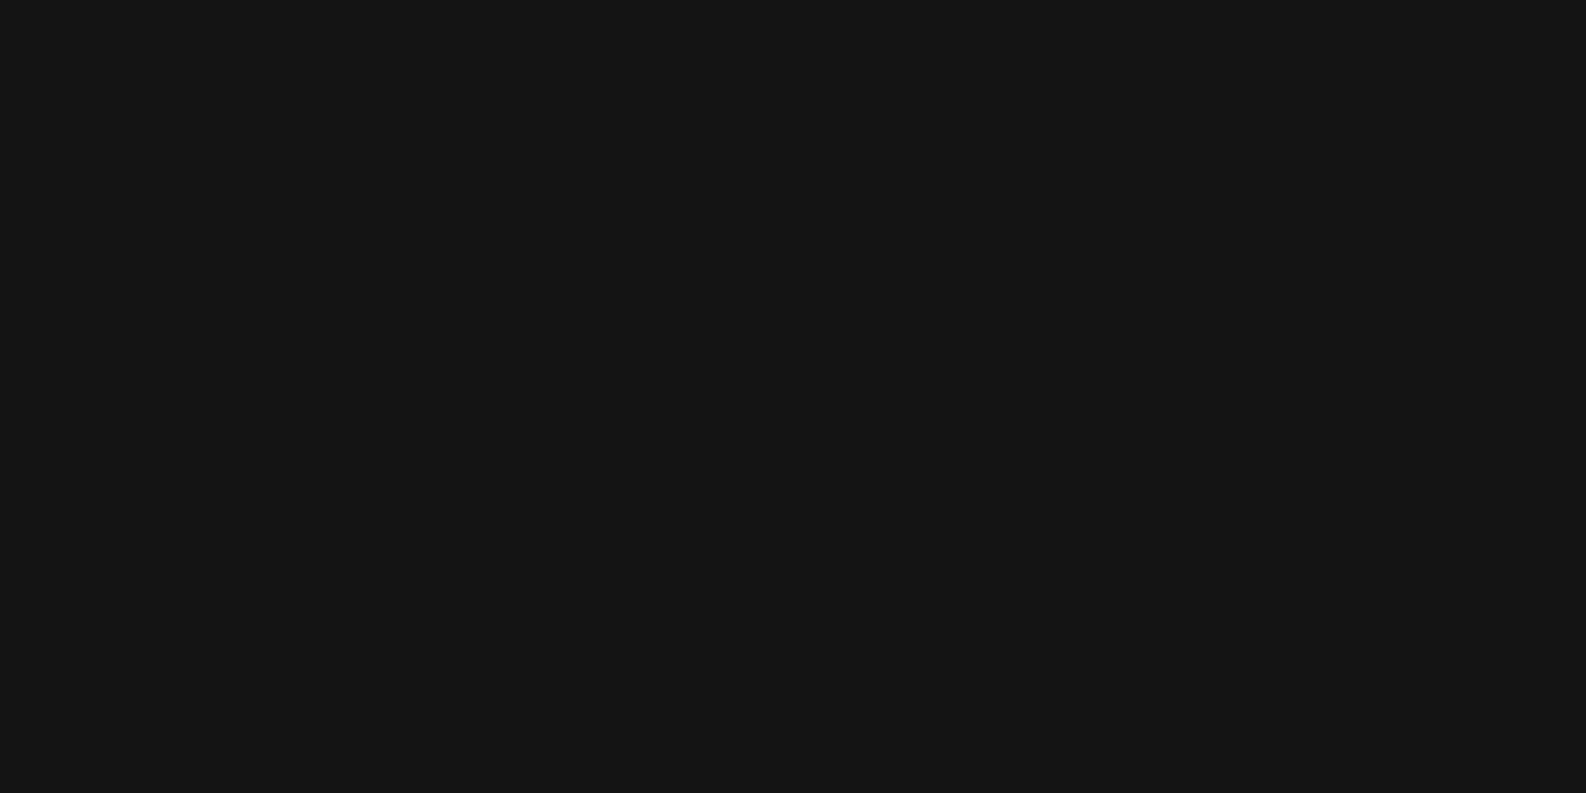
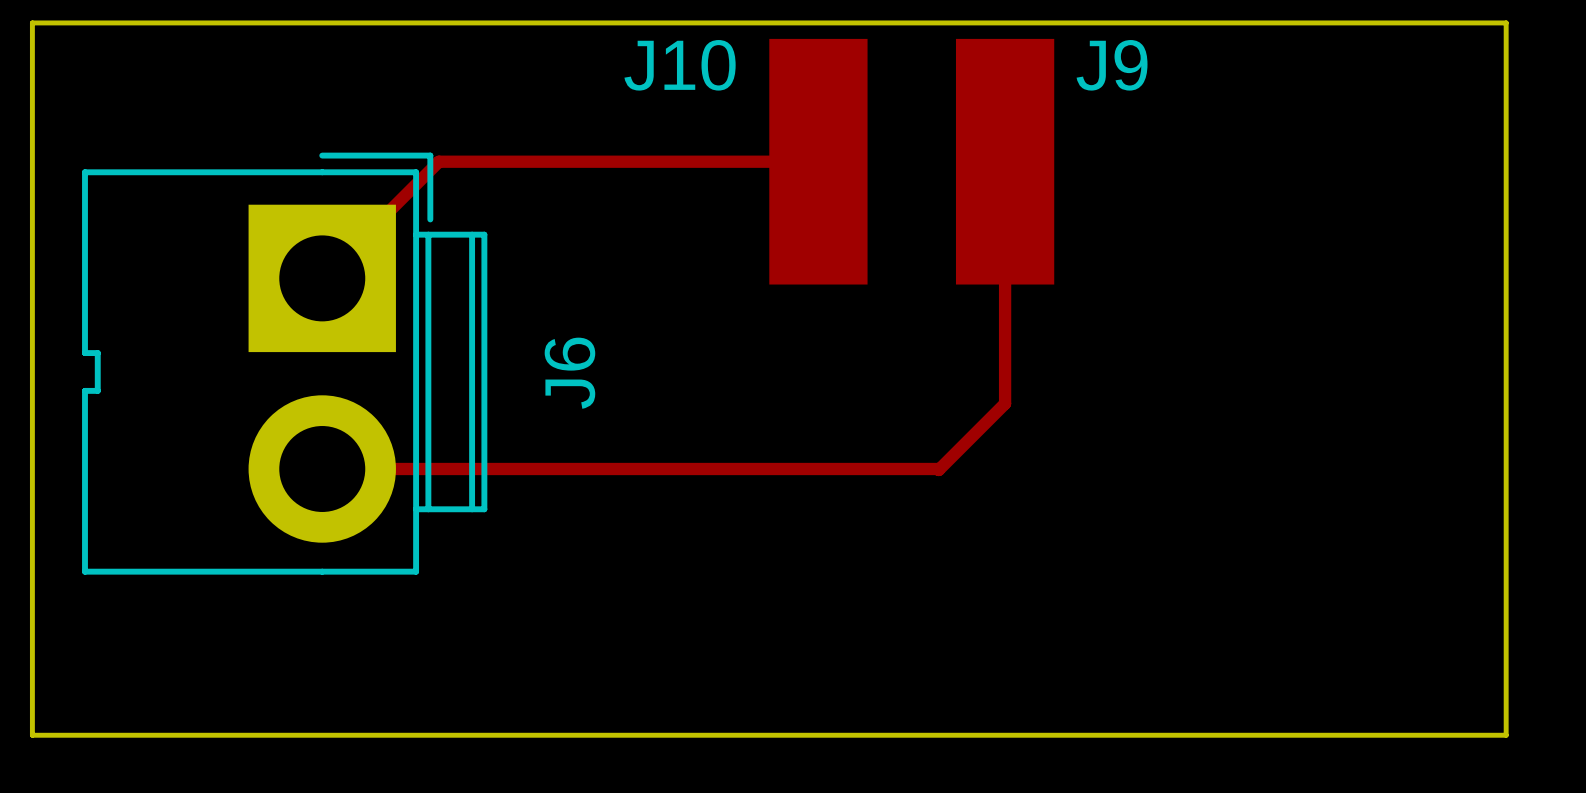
board edge: none -> (32, 22) (32, 735) (1506, 735) (1506, 22) (32, 22)
track: none -> (818, 161) (438, 161) (322, 278)
J10: none -> (818, 161)
track: none -> (1005, 161) (1005, 403) (938, 469) (322, 469)
J9: none -> (1005, 161)
J6: none -> (284, 363)

